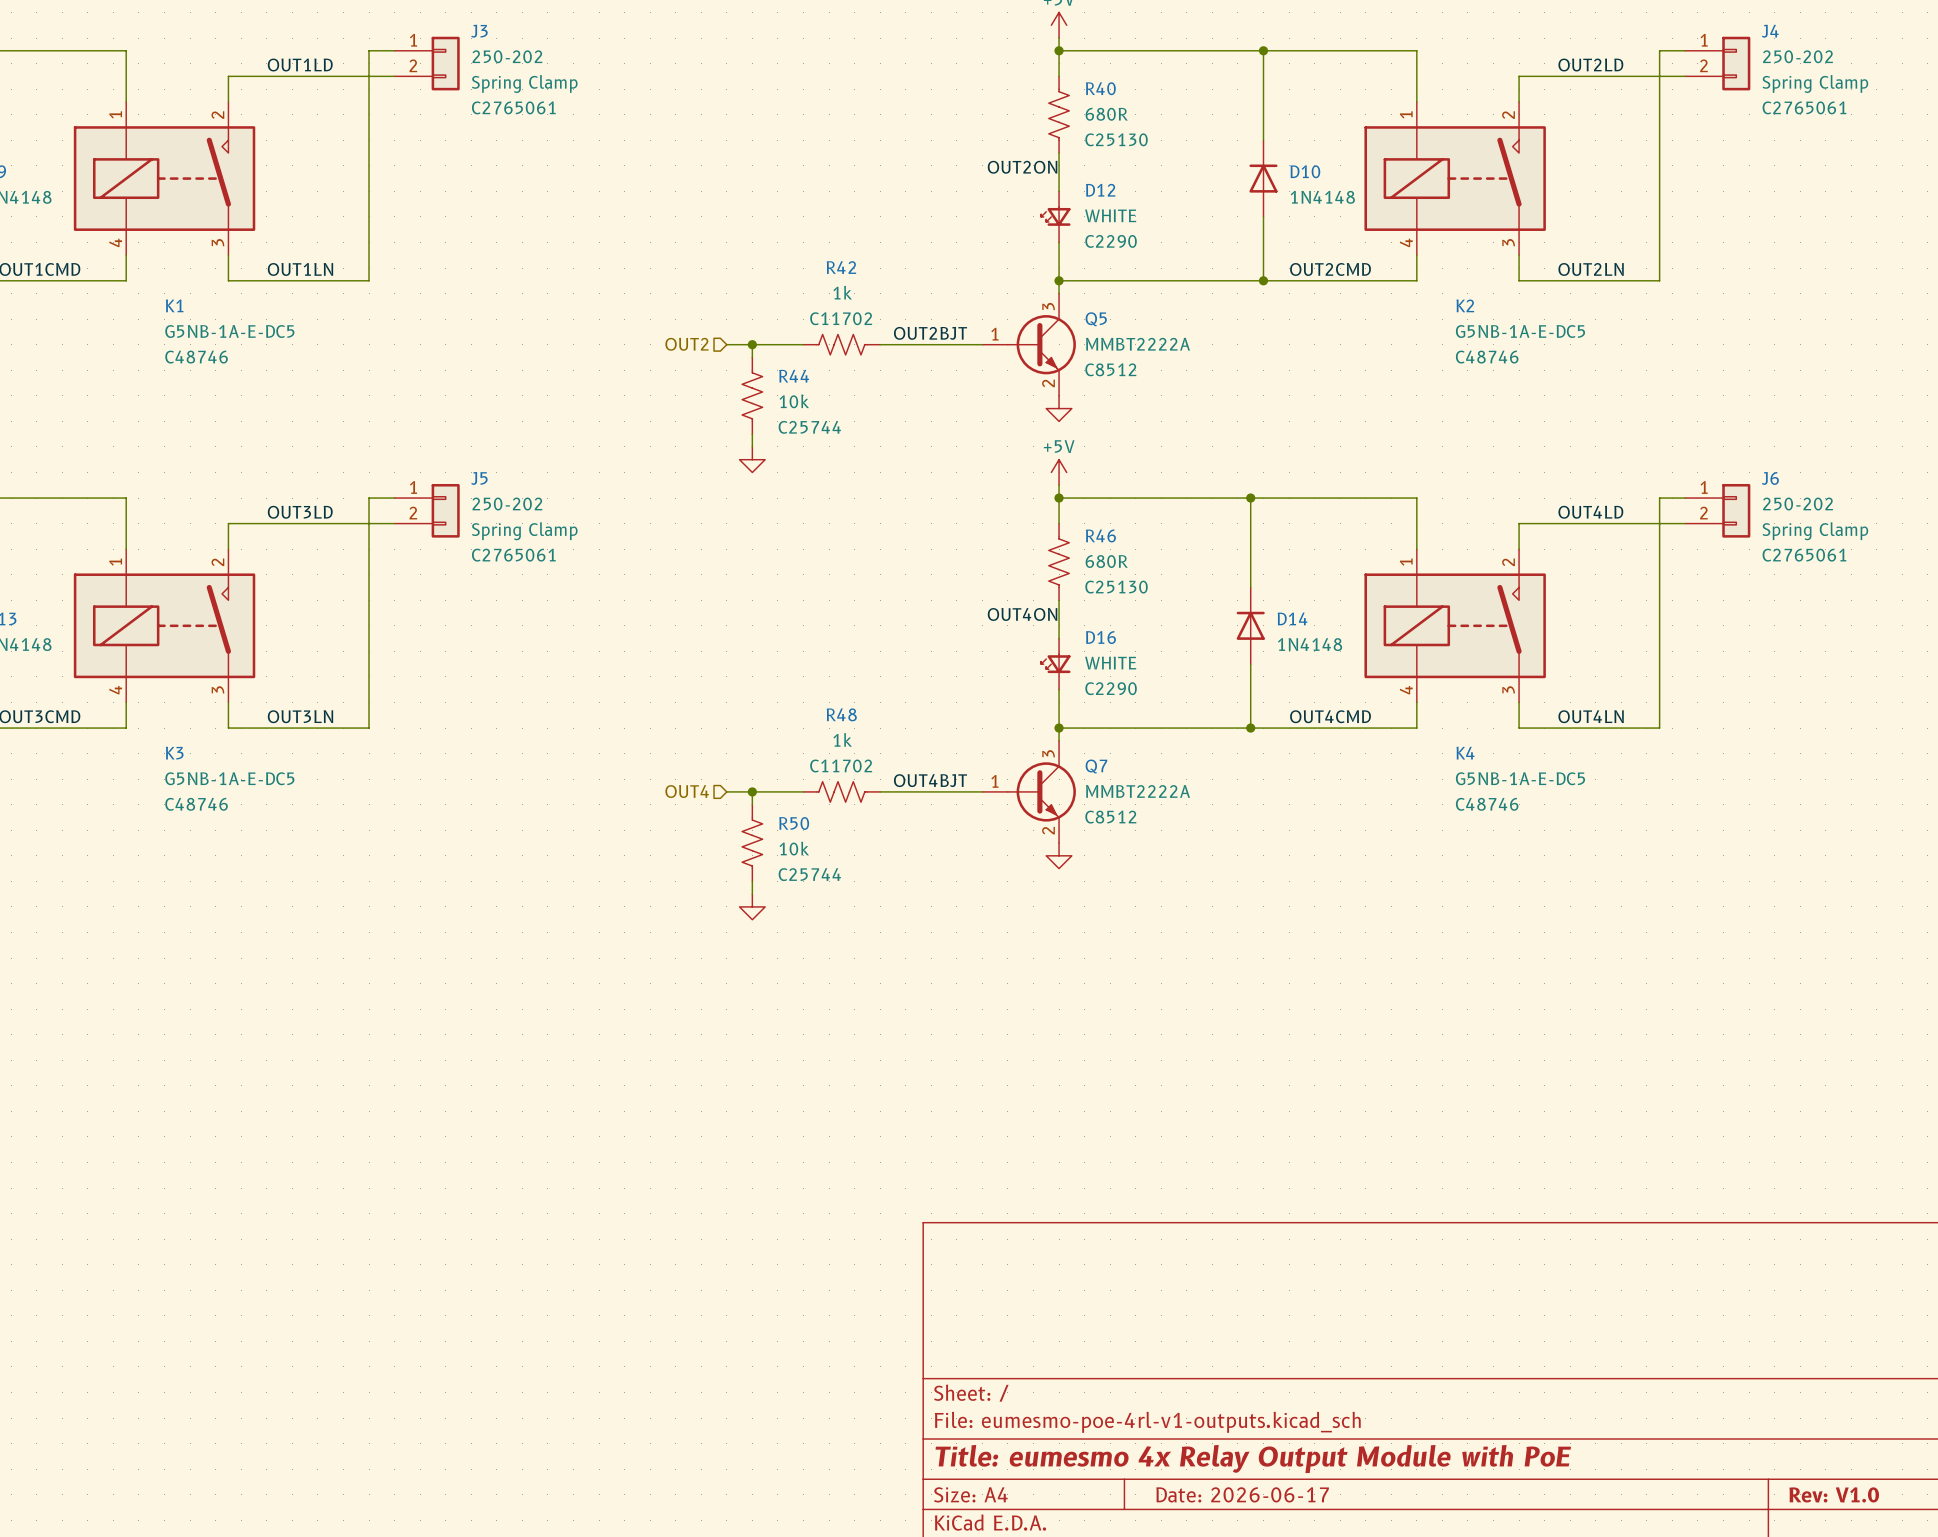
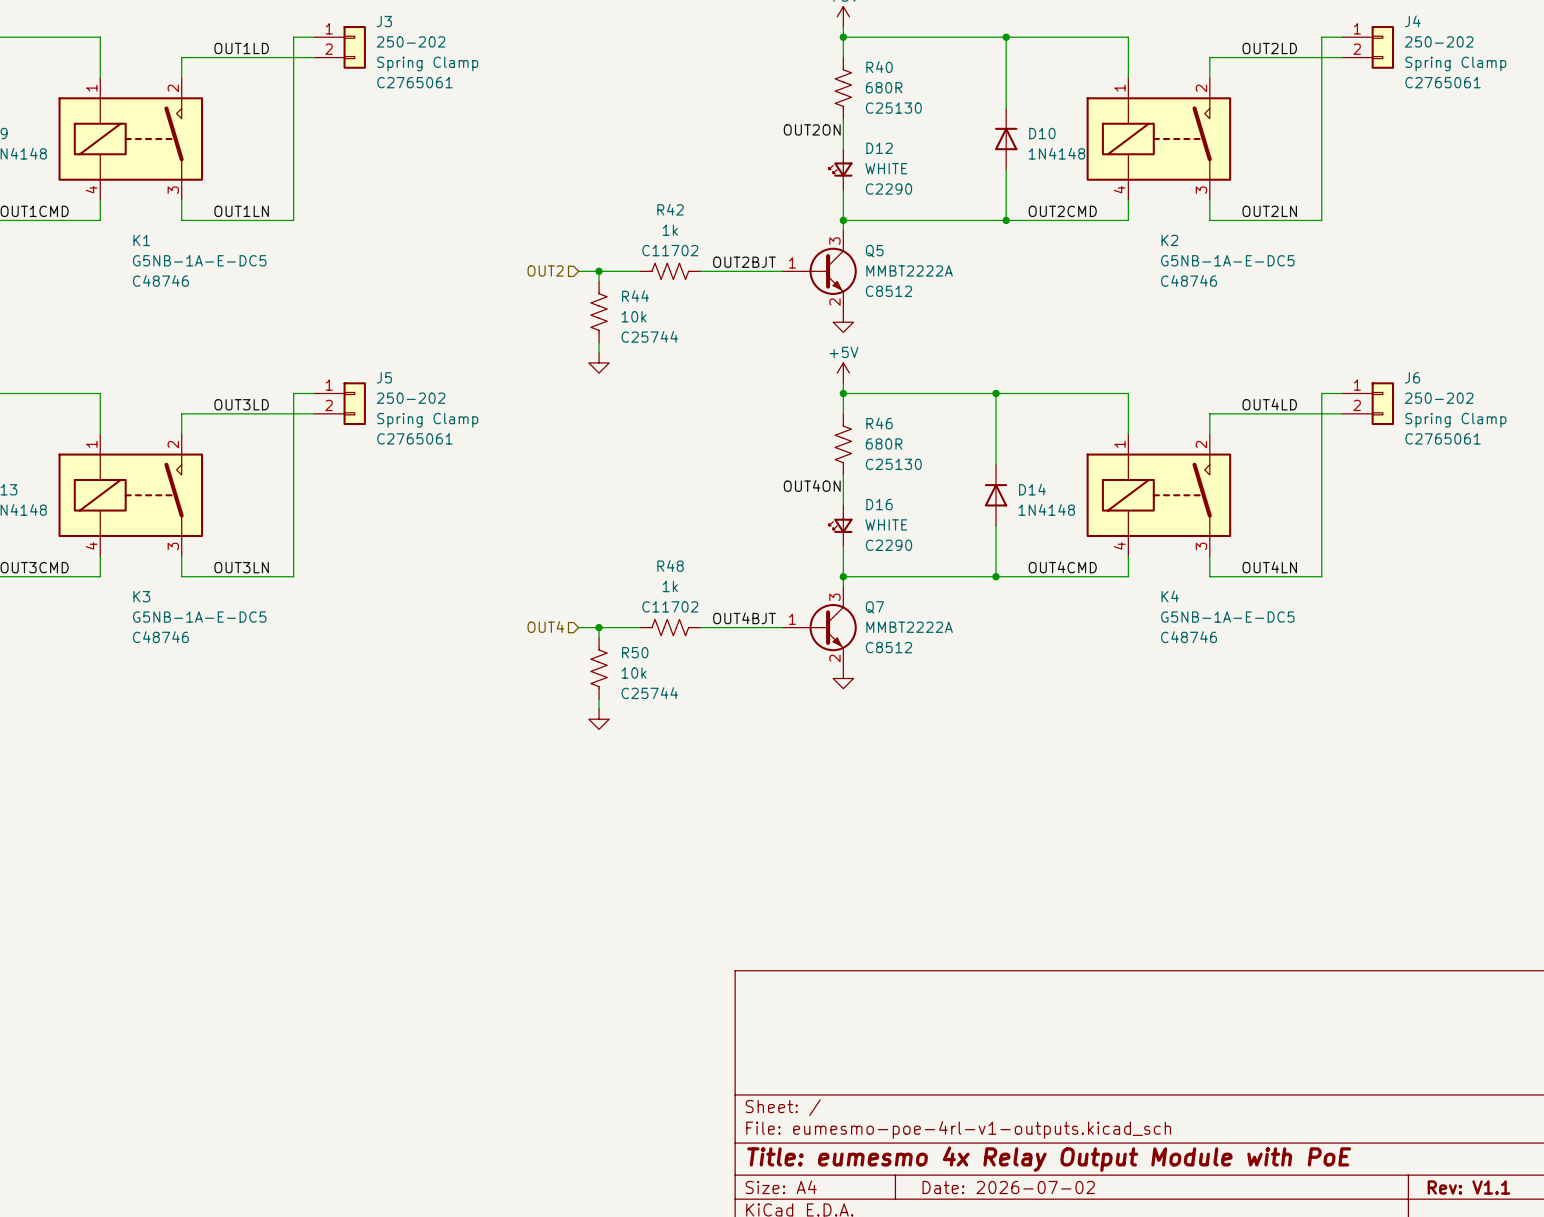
title block: Date: 2026-06-17 (1242, 1494) -> Date: 2026-07-02 (1008, 1187)
title block: Rev: V1.0 (1834, 1494) -> Rev: V1.1 (1468, 1187)

